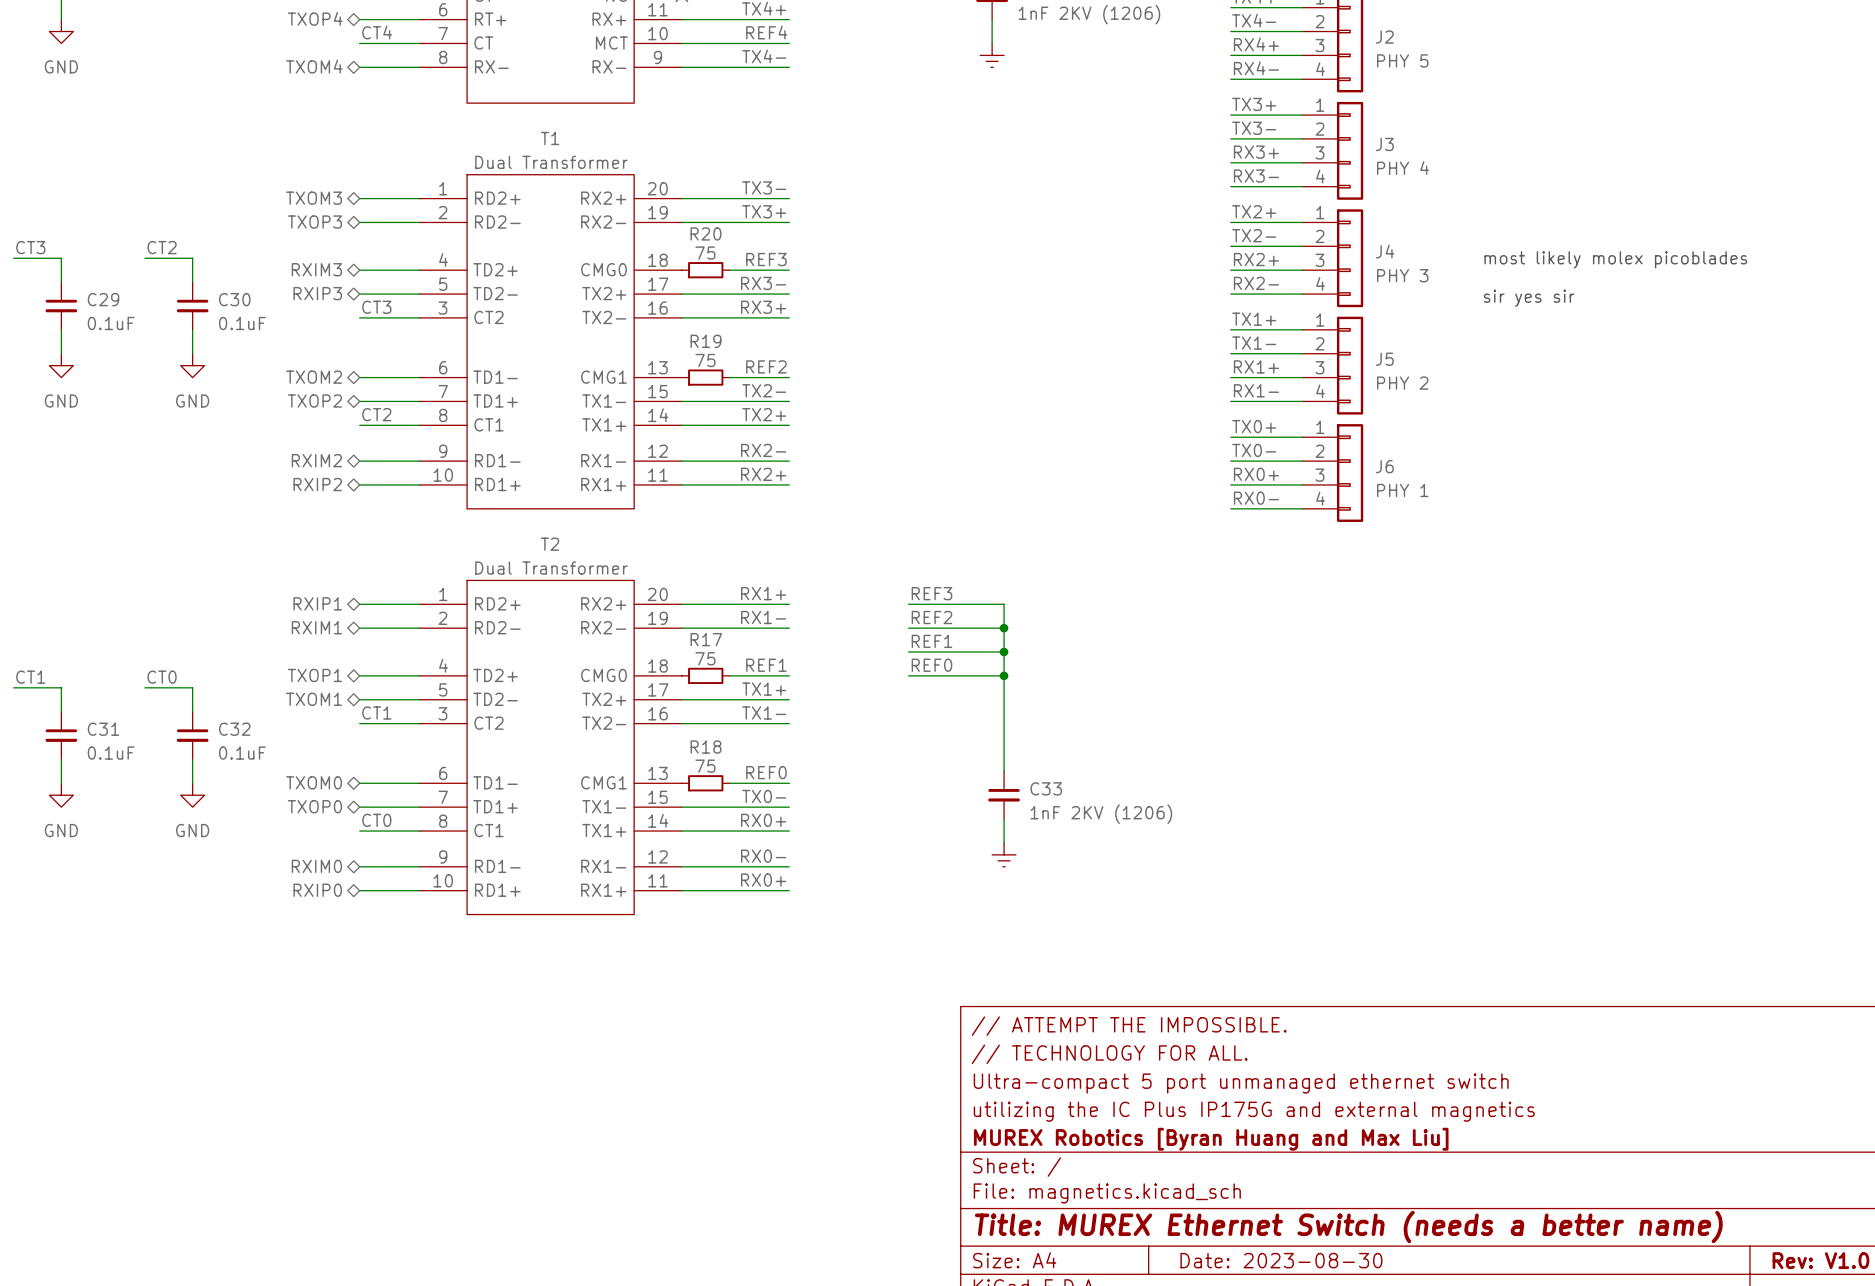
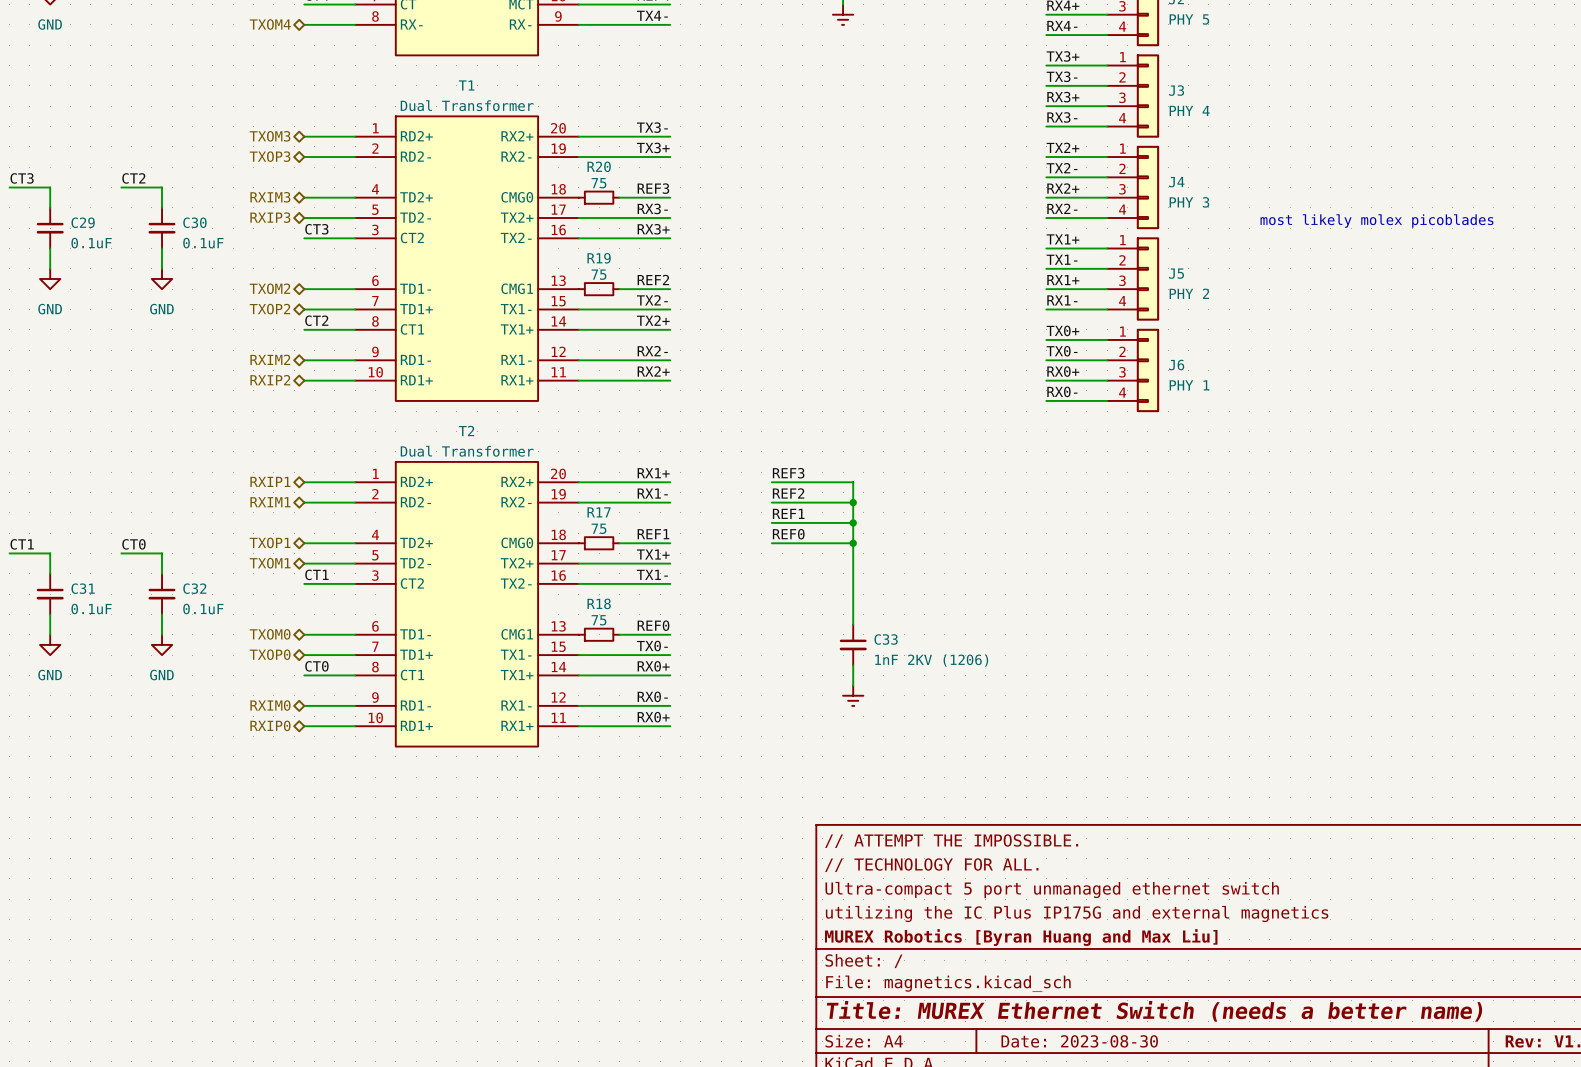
text: most likely molex picoblades (1615, 259) -> none
text: sir yes sir (1529, 298) -> most likely molex picoblades (1376, 221)

